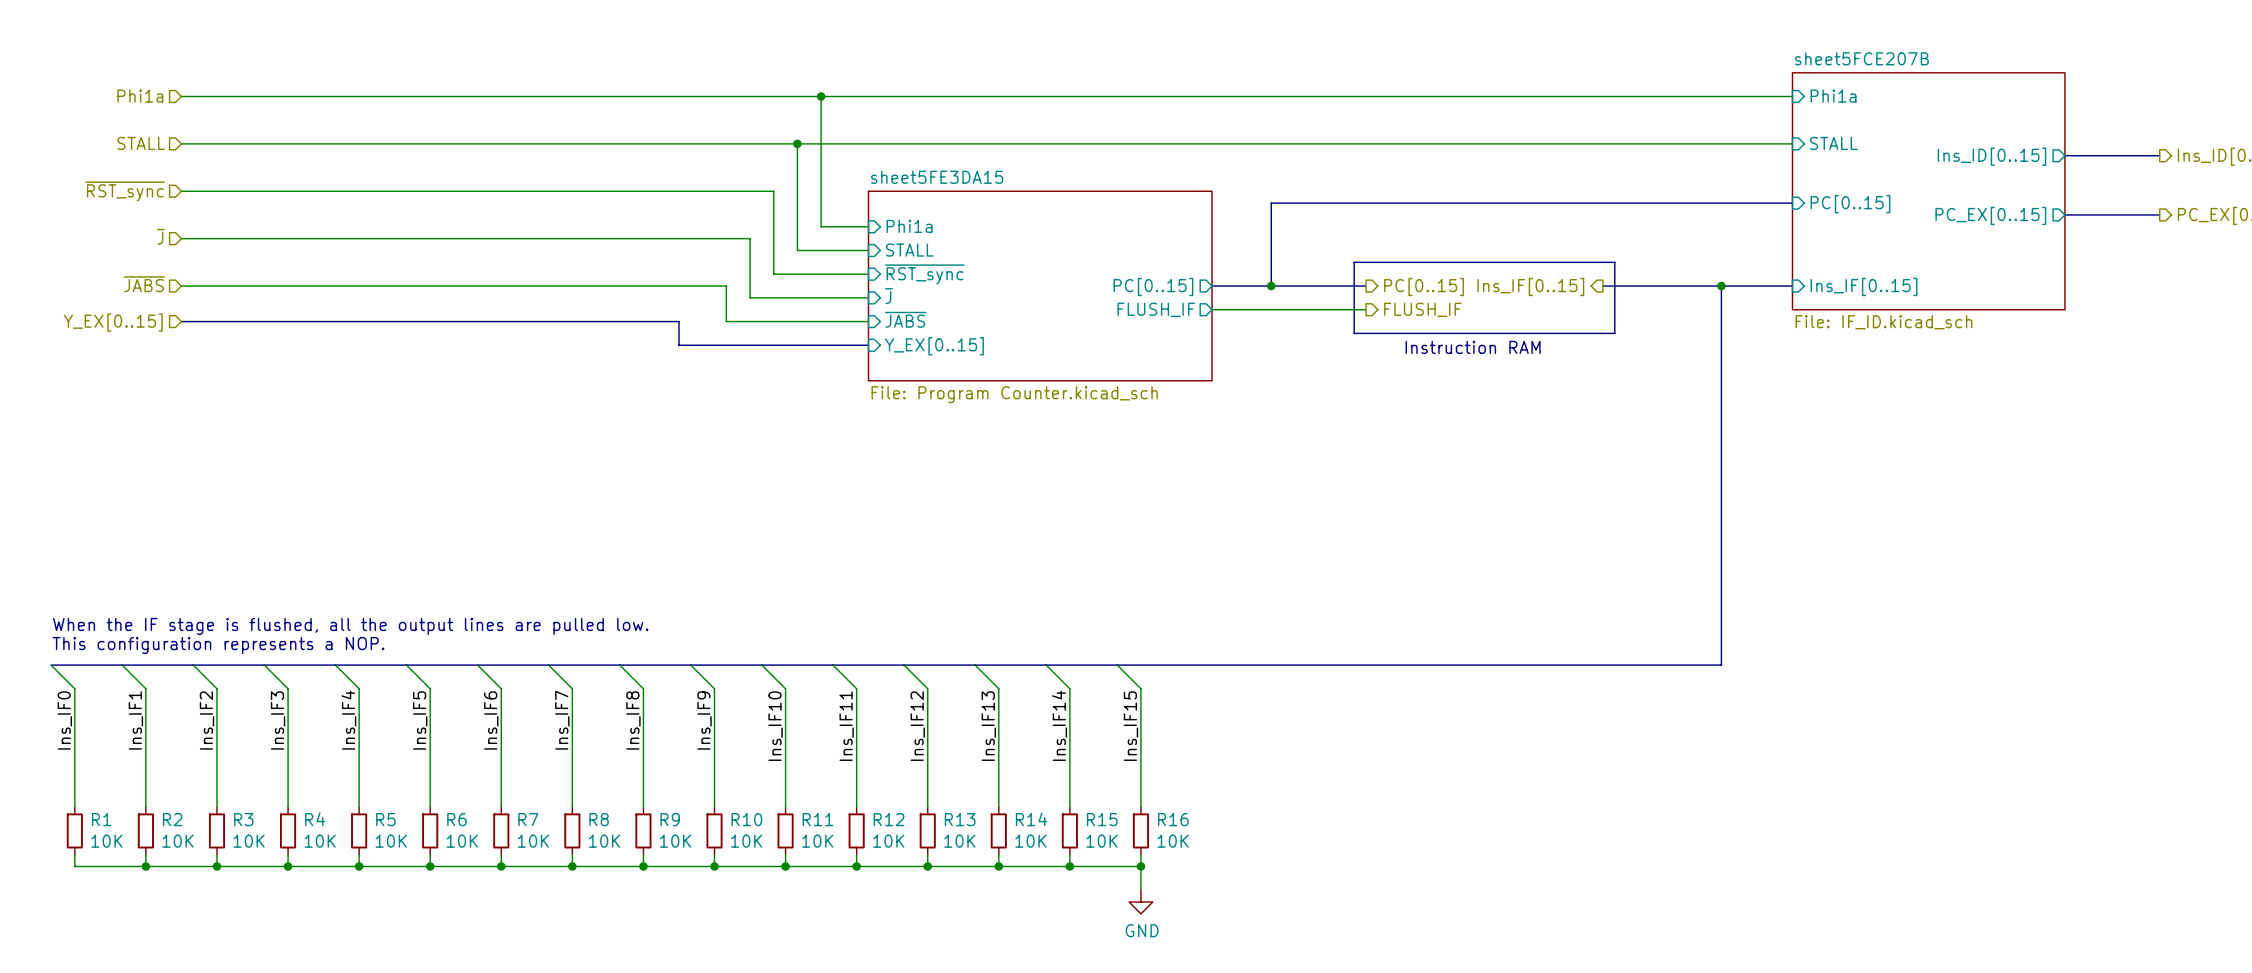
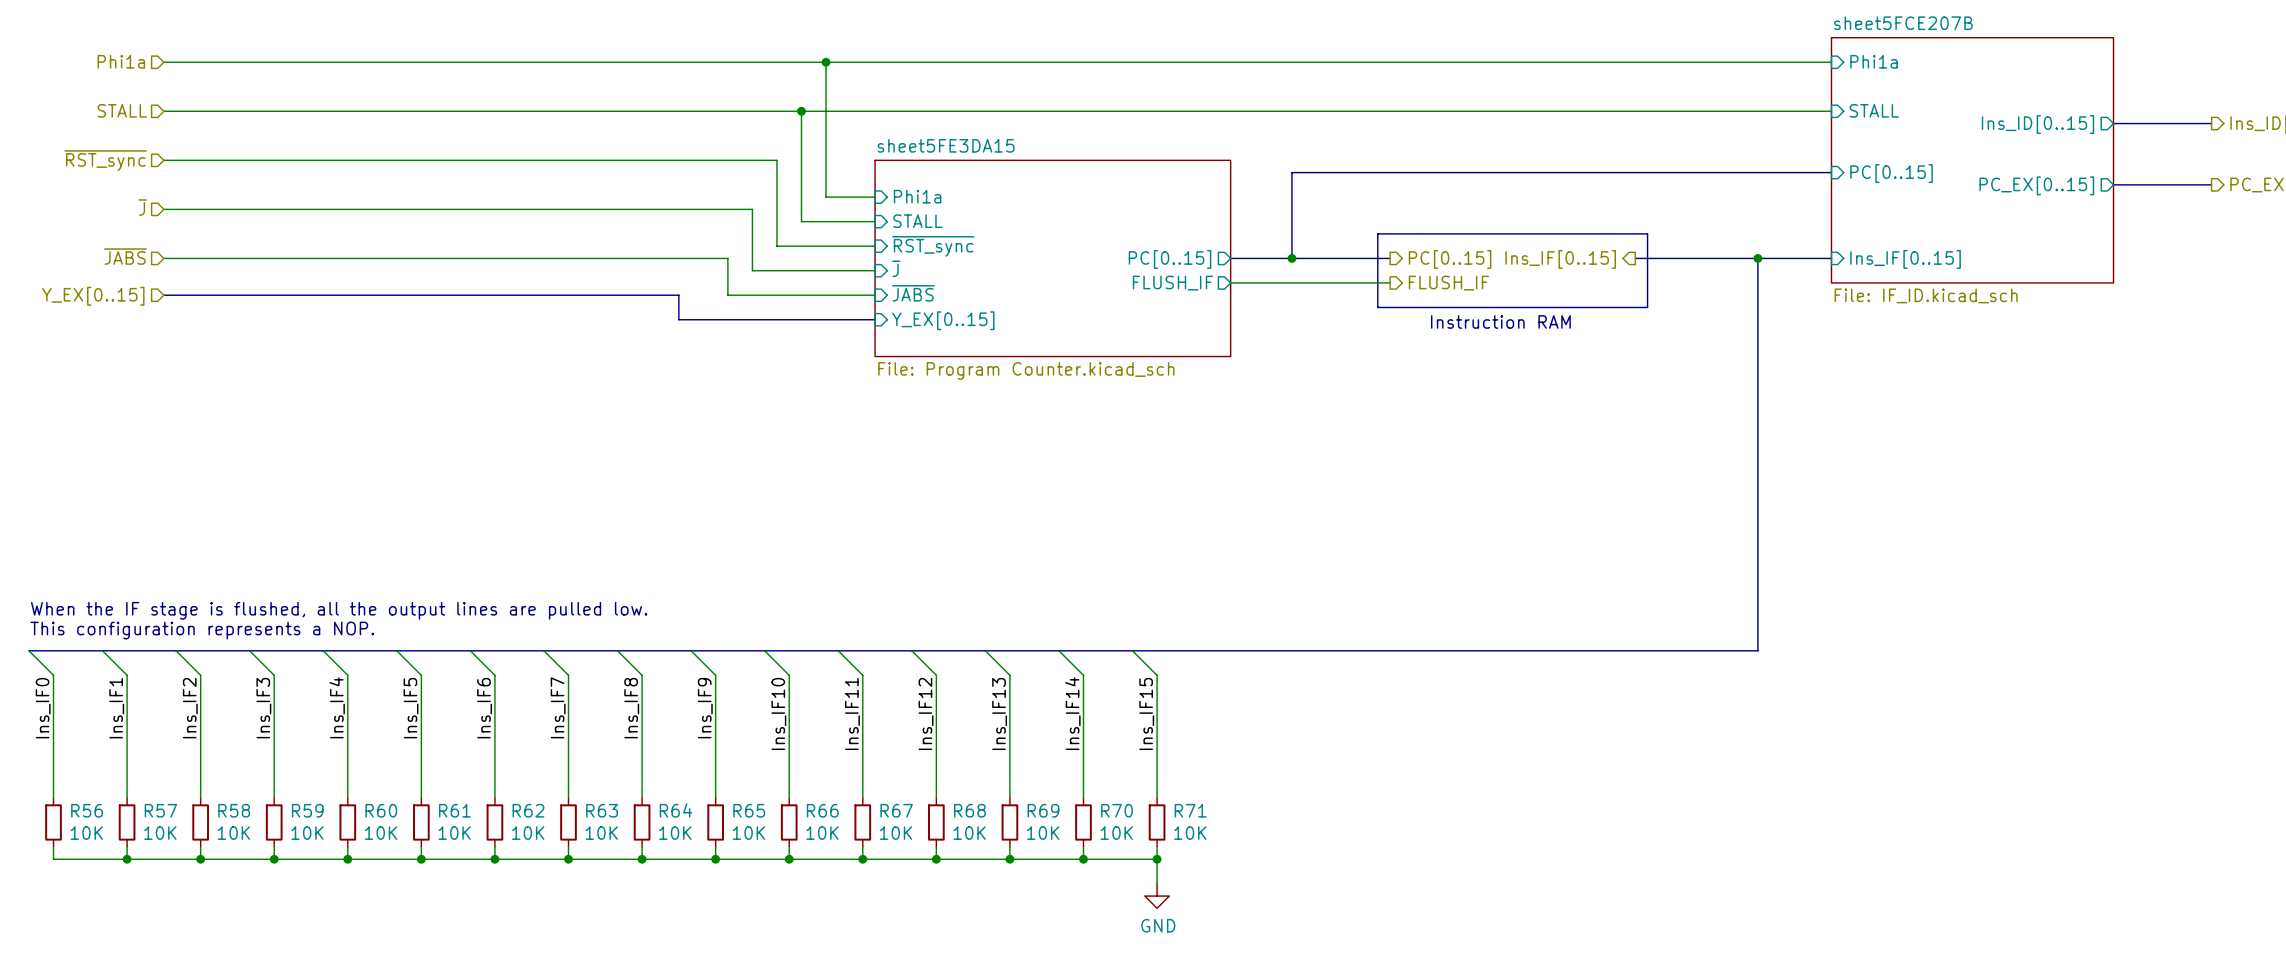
R1 name: R1 (101, 819) -> R56 (87, 810)
R2 name: R2 (172, 819) -> R57 (160, 810)
R3 name: R3 (243, 819) -> R58 (234, 810)
R4 name: R4 (315, 819) -> R59 (307, 810)
R5 name: R5 (385, 819) -> R60 (381, 810)
R6 name: R6 (456, 819) -> R61 (454, 810)
R7 name: R7 (528, 819) -> R62 (528, 810)
R8 name: R8 (599, 819) -> R63 (602, 810)
R9 name: R9 (670, 819) -> R64 (675, 810)
R10 name: R10 (746, 819) -> R65 (749, 810)
R11 name: R11 (817, 819) -> R66 (822, 810)
R12 name: R12 (889, 819) -> R67 (896, 810)
R13 name: R13 (960, 819) -> R68 (969, 810)
R14 name: R14 (1031, 819) -> R69 (1043, 810)
R15 name: R15 (1102, 819) -> R70 (1117, 810)
R16 name: R16 (1173, 819) -> R71 (1190, 810)

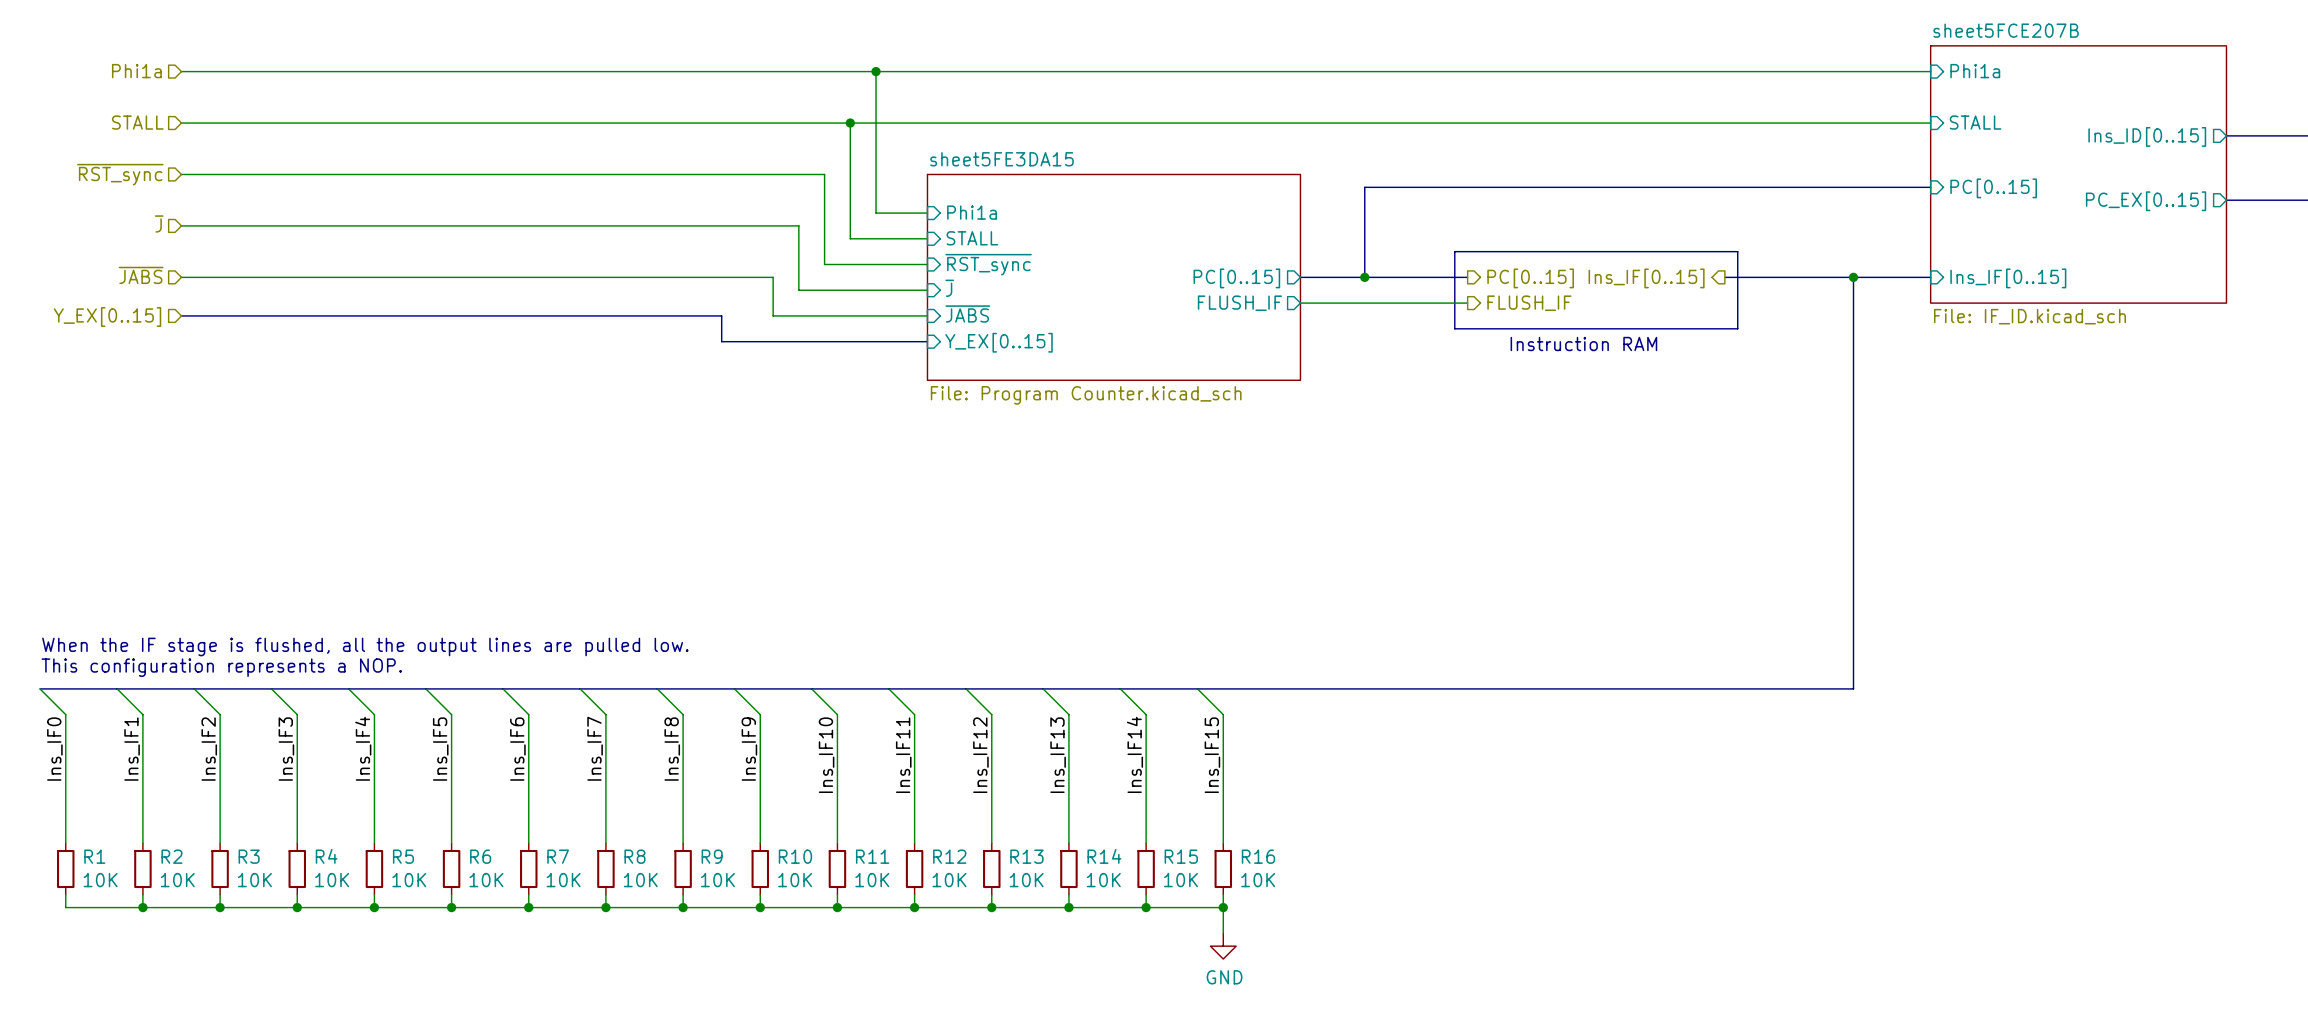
R56 name: R56 (87, 810) -> R1 (94, 856)
R57 name: R57 (160, 810) -> R2 (171, 856)
R58 name: R58 (234, 810) -> R3 (249, 856)
R59 name: R59 (307, 810) -> R4 (326, 856)
R60 name: R60 (381, 810) -> R5 (403, 856)
R61 name: R61 (454, 810) -> R6 (480, 856)
R62 name: R62 (528, 810) -> R7 (558, 856)
R63 name: R63 (602, 810) -> R8 (634, 856)
R64 name: R64 (675, 810) -> R9 (712, 856)
R65 name: R65 (749, 810) -> R10 (795, 856)
R66 name: R66 (822, 810) -> R11 (872, 856)
R67 name: R67 (896, 810) -> R12 (949, 856)
R68 name: R68 (969, 810) -> R13 (1026, 856)
R69 name: R69 (1043, 810) -> R14 (1104, 856)
R70 name: R70 (1117, 810) -> R15 (1181, 856)
R71 name: R71 (1190, 810) -> R16 (1258, 856)

